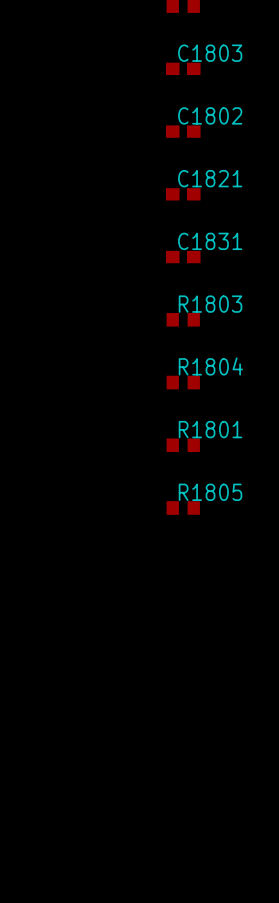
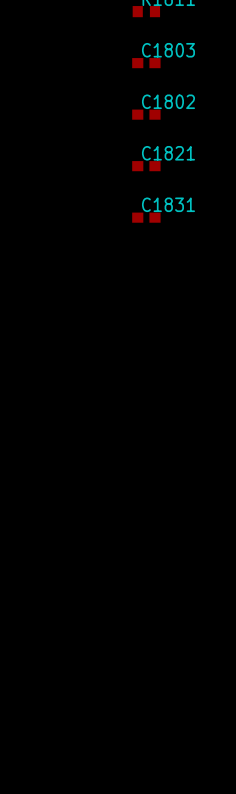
R1803: (183, 319) -> none
R1804: (183, 382) -> none
R1801: (183, 445) -> none
R1805: (183, 507) -> none

